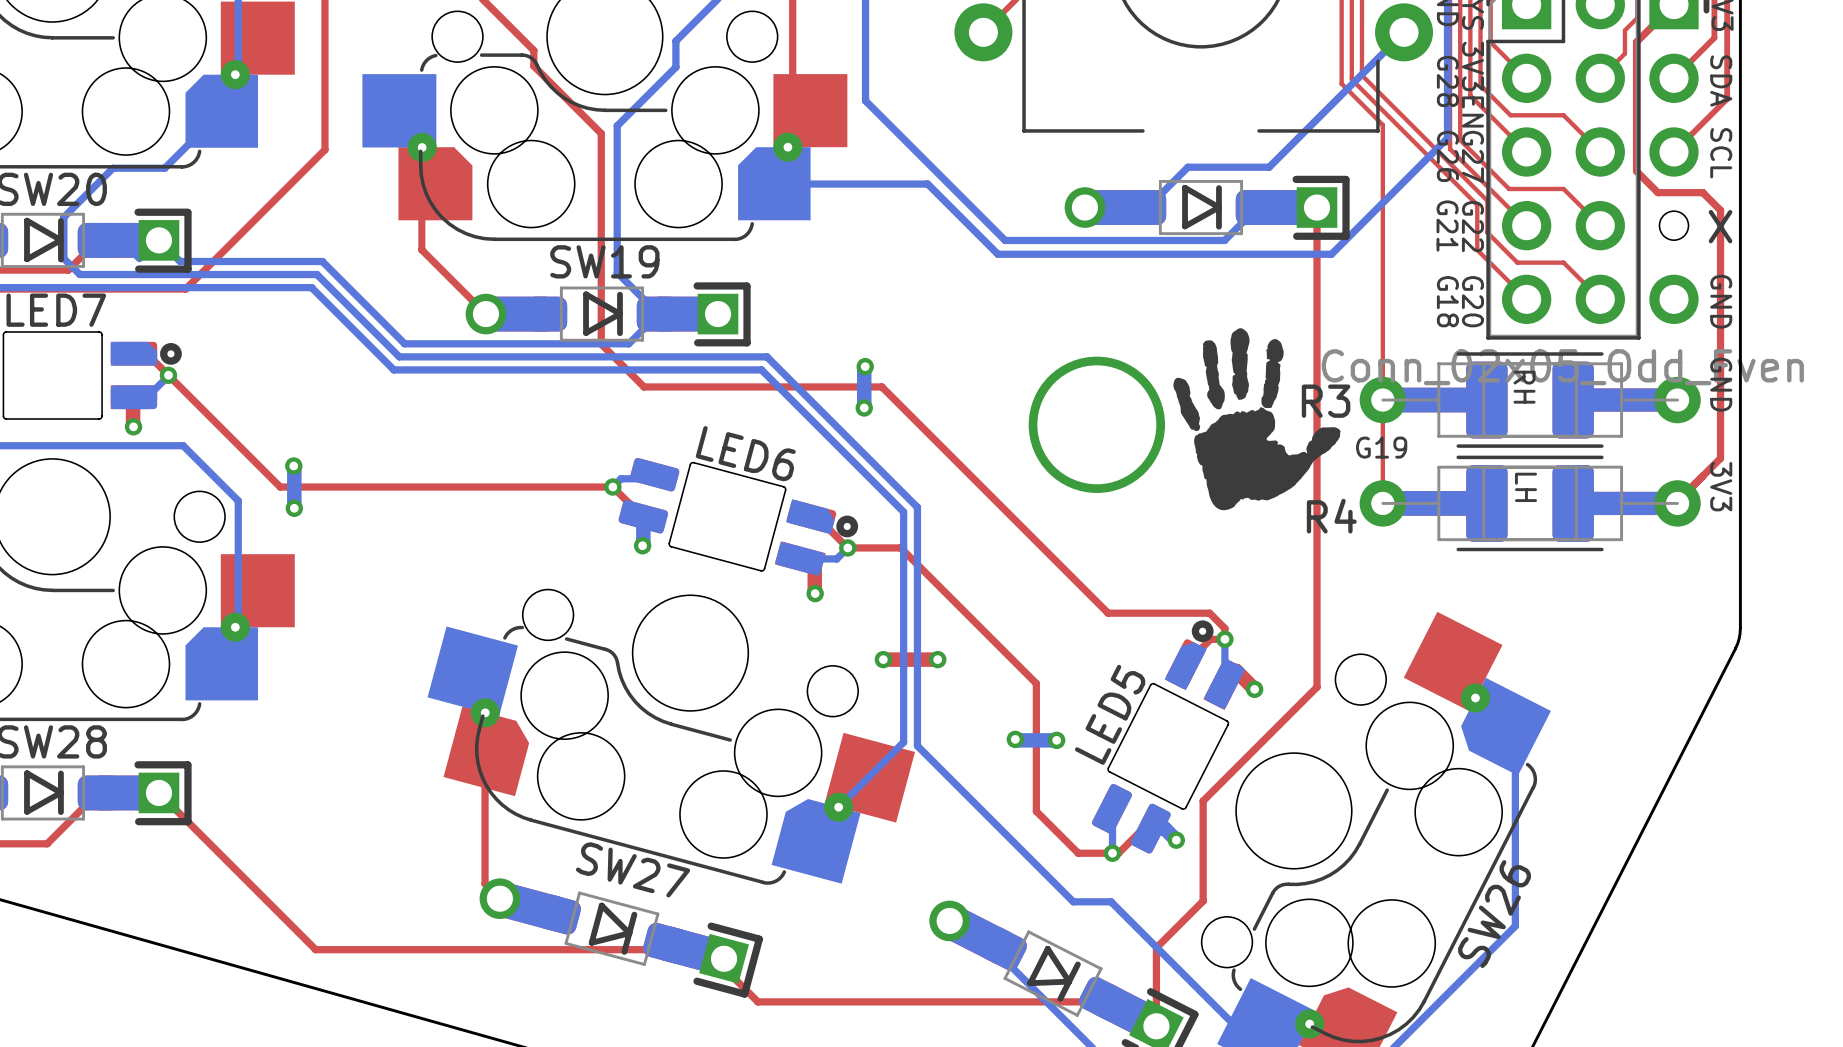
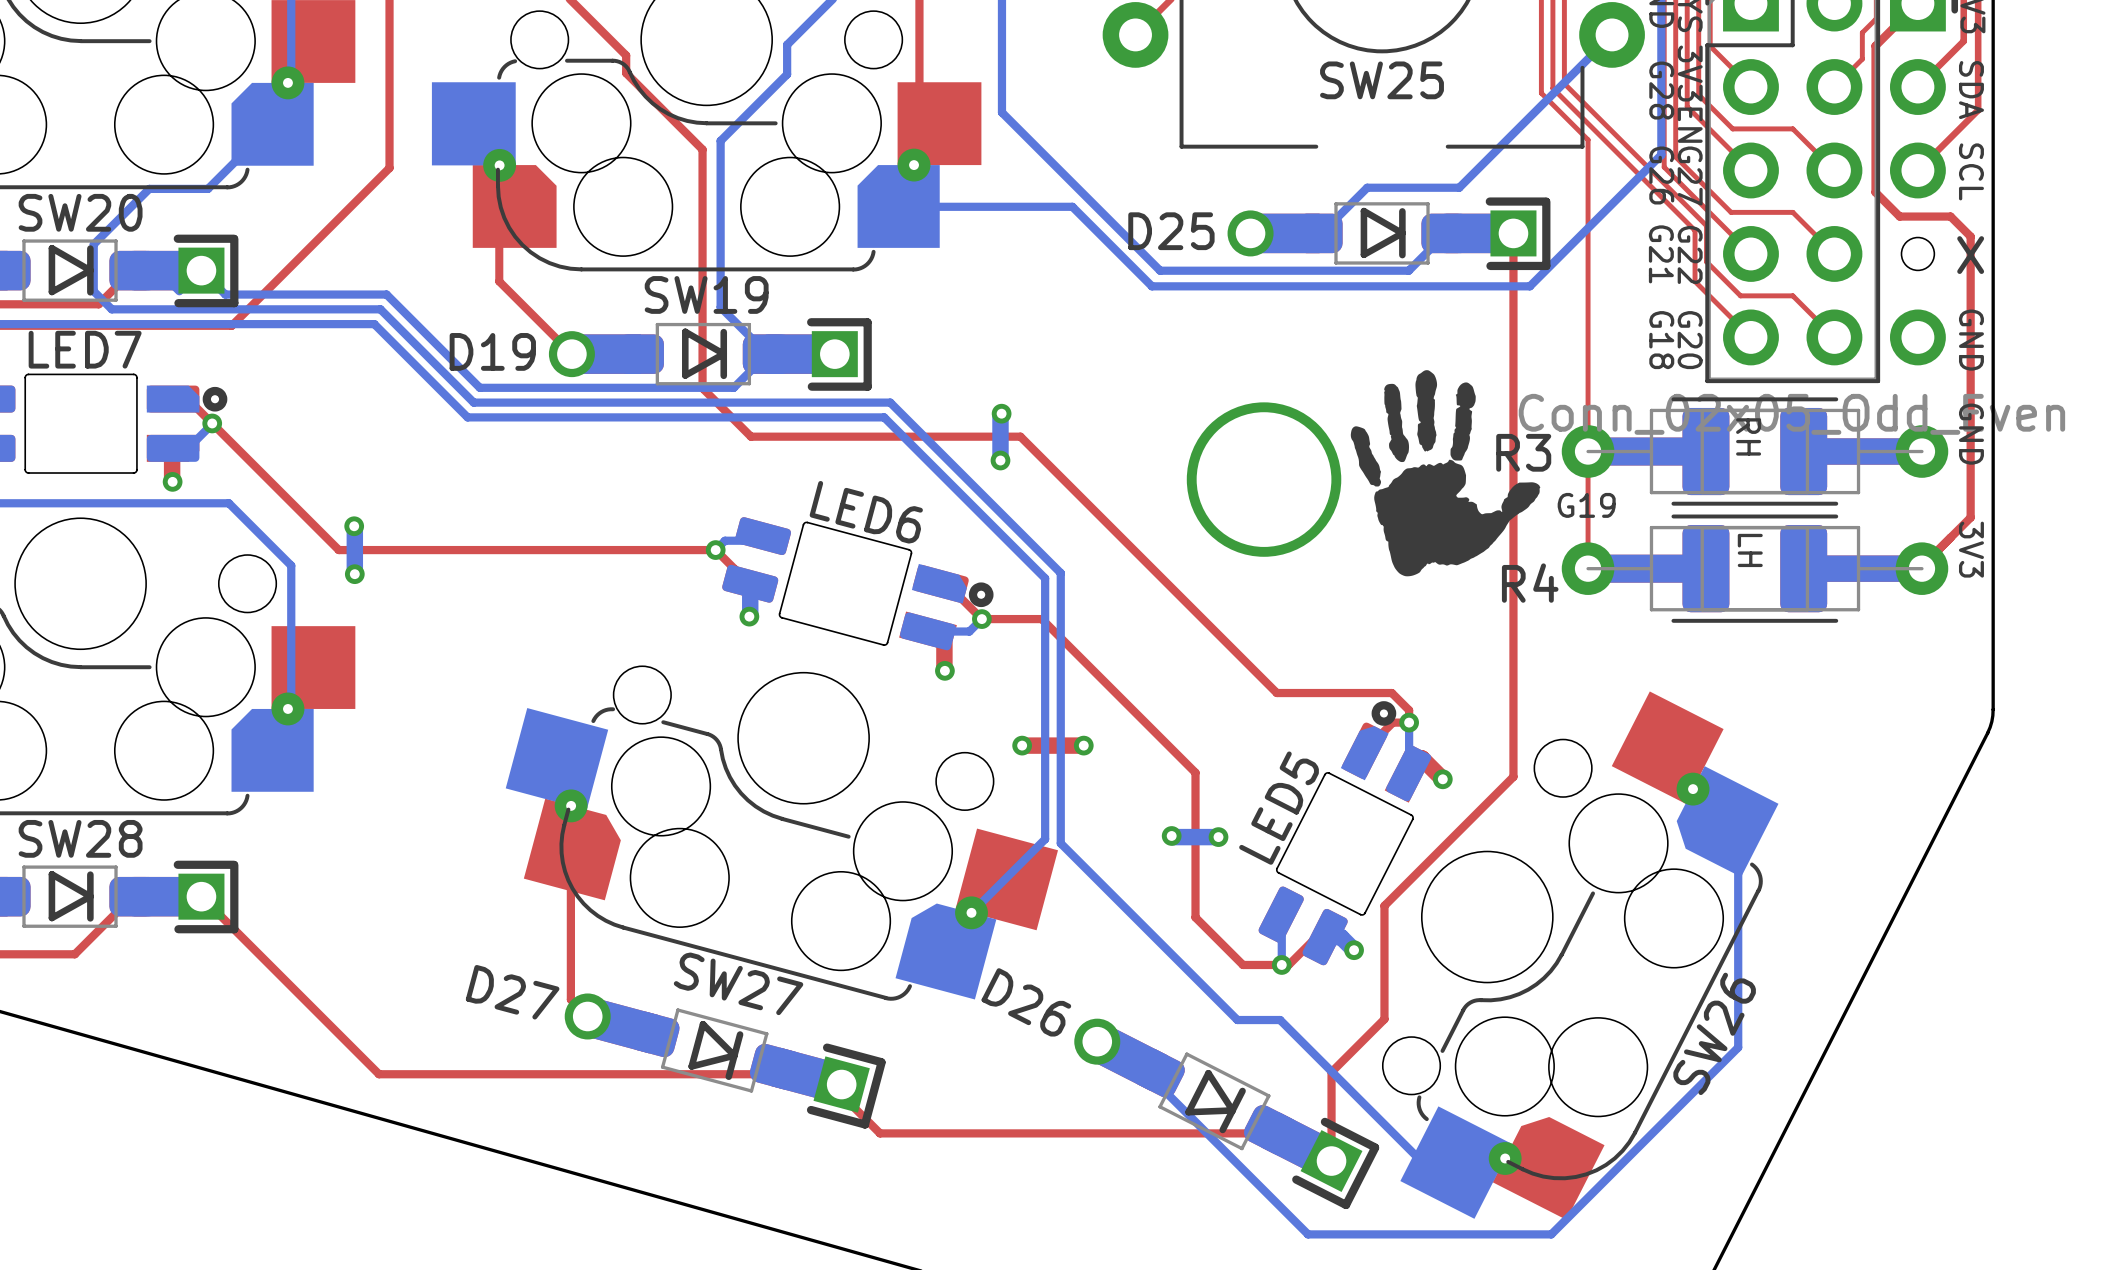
SW25 name: none -> SW25 (1382, 80)
D25 name: none -> D25 (1171, 231)
D19 name: none -> D19 (492, 351)
D27 name: none -> D27 (512, 992)
D26 name: none -> D26 (1026, 1002)

